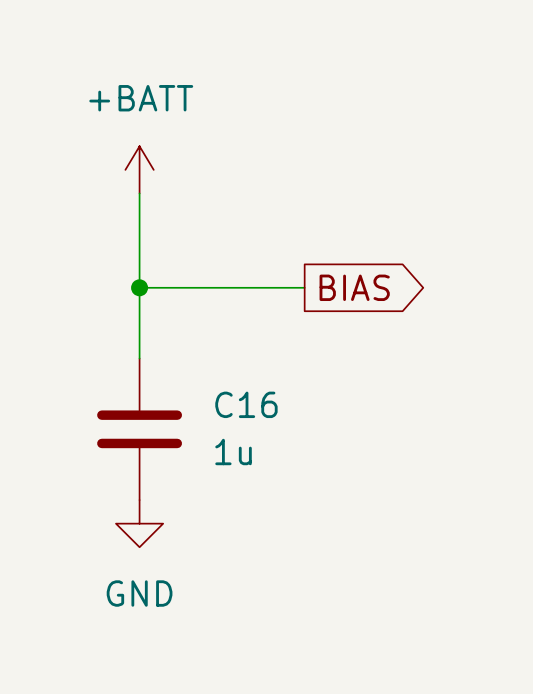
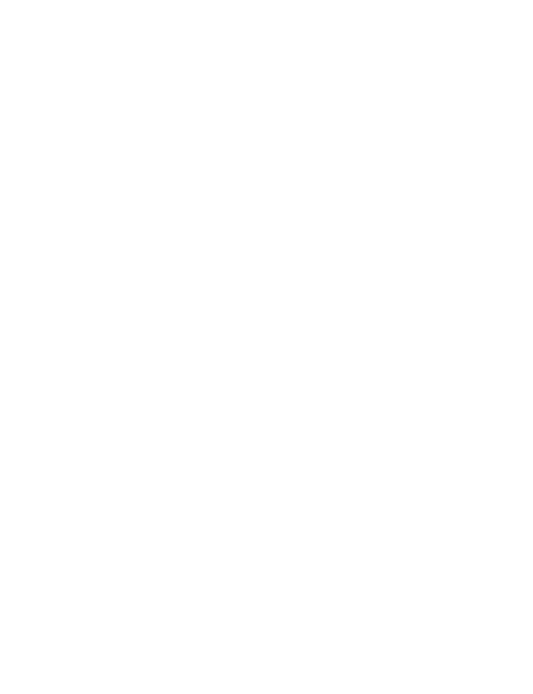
power symbol: +BATT (139, 169) -> none
wire: (139, 193) (139, 358) -> none
wire: (139, 287) (304, 287) -> none
junction: (139, 287) -> none
global label: BIAS (354, 287) -> none
C16: 1u (139, 429) -> none
power symbol: GND (139, 523) -> none

